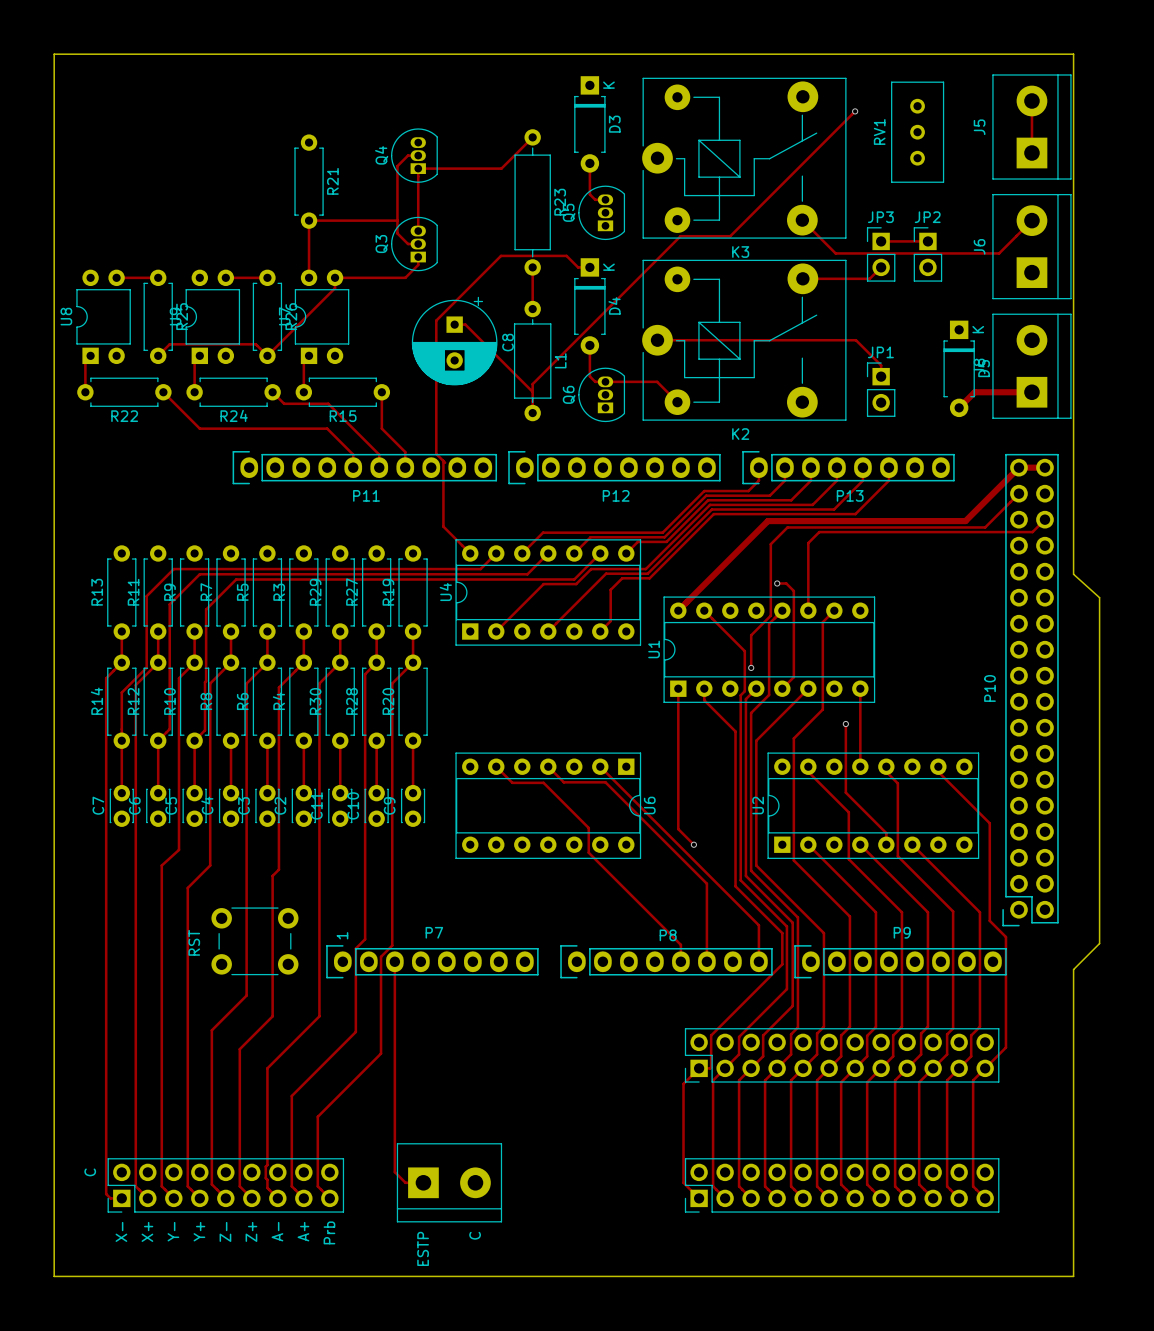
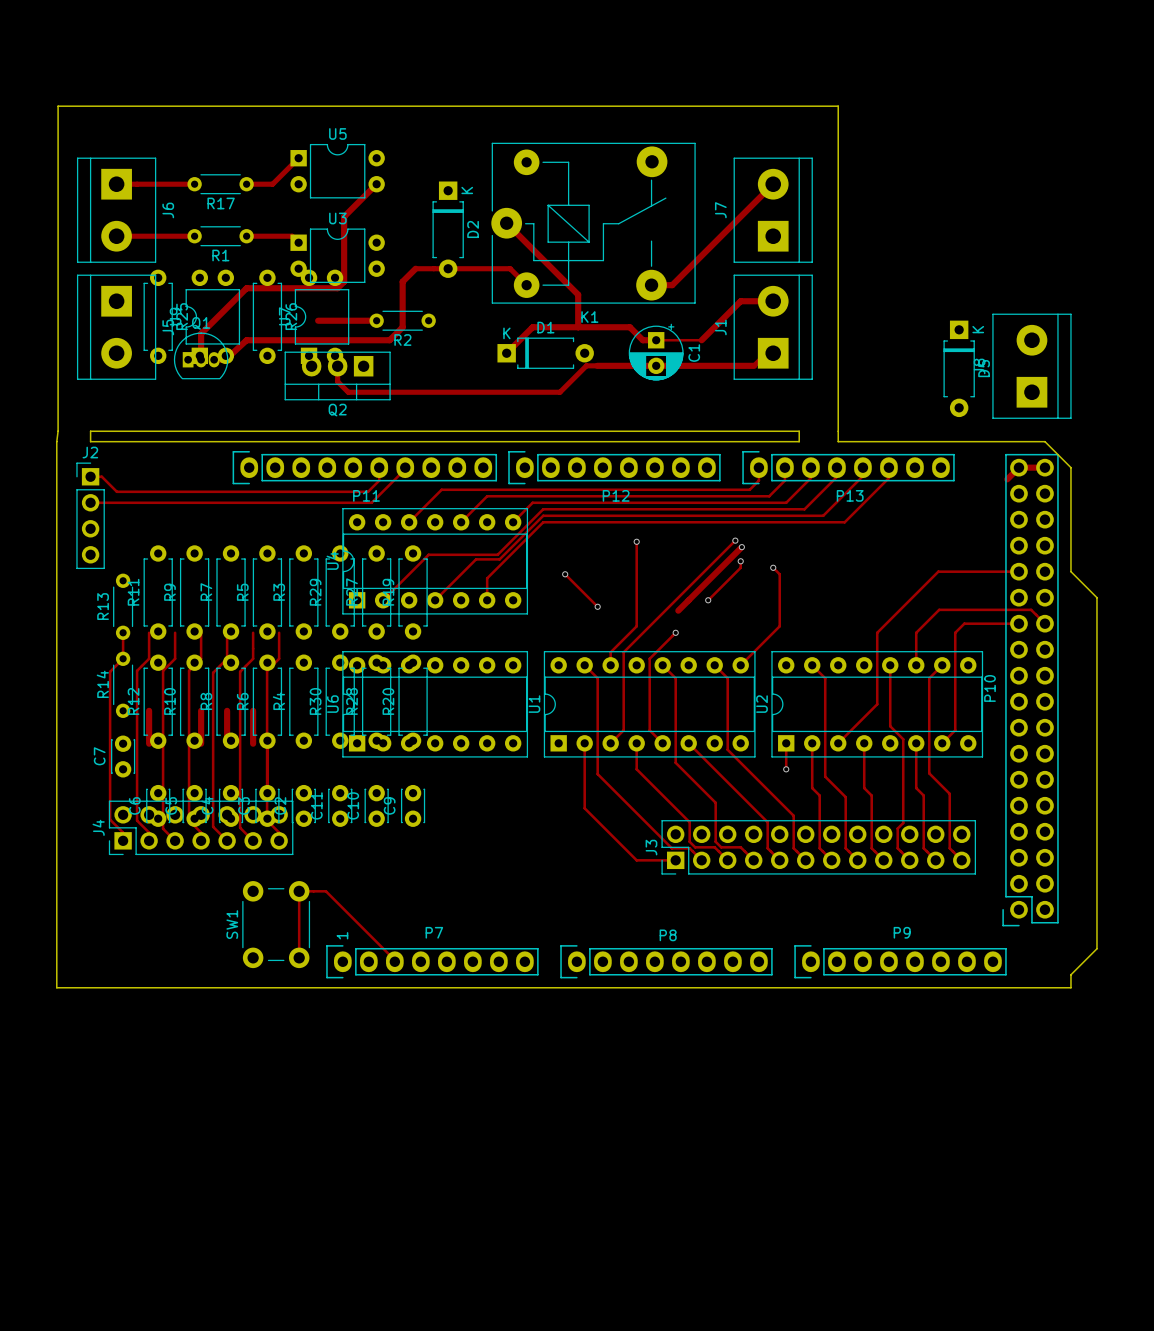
board edge: (54, 54) (54, 1276) (1073, 1276) (1073, 969) (1099, 943) (1099, 597) (1073, 574) (1073, 54) (54, 54) -> (58, 106) (56, 987) (1070, 987) (1070, 974) (1096, 948) (1096, 597) (1070, 571) (1070, 467) (1044, 441) (838, 441) (838, 106) (58, 106)
track: (1031, 101) (1031, 153) -> none
track: (855, 111) (730, 236) (680, 236) (532, 384) (532, 413) -> none
via: (855, 111) -> none
D3: (589, 124) -> none
J5 rotation: 0° (1031, 127) -> 180° (116, 327)
J5 position: (1031, 127) -> (116, 327)
RV1: (917, 132) -> none
track: (532, 137) (501, 168) (418, 168) (418, 231) -> none
Q4: (414, 155) -> none
track: (418, 155) (408, 155) (397, 166) (397, 233) (408, 244) (418, 244) -> none
track: none -> (298, 158) (272, 184) (246, 184)
K3: (744, 158) -> none
track: (589, 163) (589, 194) (595, 199) (605, 199) -> none
U5: none -> (337, 171)
R21: (309, 181) -> none
track: none -> (116, 184) (194, 184)
R17: none -> (220, 184)
track: none -> (376, 184) (344, 216) (344, 281) (337, 288) (246, 288) (201, 333) (201, 359)
track: none -> (773, 184) (672, 285) (651, 285)
R23: (532, 202) -> none
J7: none -> (773, 210)
Q5: (601, 212) -> none
track: (397, 220) (309, 220) (309, 277) -> none
track: (802, 220) (835, 253) (999, 253) (1031, 220) -> none
track: none -> (506, 223) (578, 294) (578, 327)
K1: none -> (593, 223)
D2: none -> (448, 229)
track: none -> (116, 236) (194, 236)
R1: none -> (220, 236)
track: none -> (246, 236) (292, 236) (298, 242)
track: (881, 241) (927, 241) -> none
Q3: (414, 244) -> none
J6 rotation: 0° (1031, 246) -> 180° (116, 210)
J6 position: (1031, 246) -> (116, 210)
JP3: (881, 254) -> none
JP2: (927, 254) -> none
U3: none -> (337, 255)
track: (418, 257) (418, 264) (405, 277) (335, 277) (335, 288) (267, 355) (255, 344) (169, 344) (158, 355) -> none
track: (532, 267) (532, 309) -> none
track: (589, 267) (578, 267) (566, 255) (501, 255) (436, 320) (436, 453) (445, 462) -> none
track: (881, 267) (869, 278) (802, 278) -> none
track: (116, 277) (158, 277) -> none
track: (225, 277) (267, 277) -> none
track: none -> (526, 285) (510, 268) (415, 268) (402, 281) (402, 327) (389, 340) (246, 340) (225, 359) (214, 359)
D4: (589, 306) -> none
U8: (103, 316) -> none
track: none -> (318, 320) (376, 320)
R2: none -> (402, 320)
track: (454, 324) (465, 324) (532, 391) -> none
J1: none -> (773, 327)
track: none -> (657, 340) (642, 340) (629, 327) (532, 327) (506, 353)
track: (701, 340) (856, 340) (881, 365) (881, 376) -> (701, 340) (740, 301) (773, 301)
K2: (744, 340) -> none
C8: (454, 341) -> none
track: (589, 345) (589, 376) (595, 381) (657, 381) (677, 402) -> none
C1: none -> (656, 352)
D1: none -> (545, 353)
track: none -> (773, 353) (766, 353) (754, 365) (586, 365) (560, 392) (348, 392) (337, 381) (337, 366)
track: (90, 355) (85, 361) (85, 392) -> none
track: (199, 355) (194, 361) (194, 392) -> none
Q1: none -> (201, 355)
track: (309, 355) (303, 361) (303, 392) -> none
L1: (532, 361) -> none
Q2: none -> (337, 375)
JP1: (881, 389) -> none
R22: (124, 392) -> none
track: (163, 392) (199, 428) (327, 428) (353, 454) (353, 467) -> none
R24: (233, 392) -> none
track: (272, 392) (284, 403) (328, 403) (379, 454) (379, 467) -> (90, 476) (101, 476) (116, 491) (368, 491) (379, 480) (379, 467)
R15: (342, 392) -> none
track: (381, 392) (381, 428) (405, 452) (405, 467) -> (90, 502) (371, 502) (405, 467)
track: (1031, 392) (974, 392) (959, 407) -> none
Q6: (601, 394) -> none
board edge: none -> (90, 431) (90, 441) (799, 441) (799, 431) (90, 431)
track: (443, 461) (443, 526) (470, 553) -> none
track: (836, 476) (836, 480) (812, 504) (710, 504) (645, 569) (591, 569) (576, 584) (543, 584) (496, 631) -> (836, 476) (804, 509) (543, 509) (497, 554) (428, 554) (383, 600)
track: (862, 476) (862, 480) (834, 509) (711, 509) (647, 573) (606, 573) (548, 631) -> (862, 476) (823, 515) (543, 515) (499, 559) (476, 559) (435, 600)
track: (810, 478) (810, 480) (791, 500) (708, 500) (666, 541) (637, 541) (626, 553) -> (810, 478) (786, 502) (532, 502) (513, 522)
track: (888, 478) (888, 480) (855, 514) (713, 514) (649, 578) (622, 578) (610, 589) (610, 621) (600, 631) -> (888, 478) (844, 522) (543, 522) (487, 578) (487, 600)
track: (1007, 479) (965, 521) (767, 521) (740, 548) -> none
track: (749, 489) (704, 491) (662, 532) (543, 532) (522, 553) -> (749, 489) (441, 489) (409, 522)
track: (1018, 493) (985, 527) (787, 527) (770, 544) (770, 615) (751, 635) (751, 667) -> none
track: (769, 495) (706, 495) (664, 537) (590, 537) (574, 553) -> (769, 495) (487, 496) (461, 522)
J2: none -> (90, 515)
track: (1044, 519) (1032, 532) (819, 532) (808, 543) (808, 610) -> none
track: none -> (735, 540) (623, 652) (623, 730) (610, 743)
via: none -> (735, 540)
track: none -> (636, 541) (636, 626) (610, 652) (610, 665)
via: none -> (636, 541)
R13 footprint: [107, 545, 137, 640] -> [113, 573, 134, 640]
via: none -> (741, 547)
track: (496, 553) (480, 569) (173, 569) (146, 596) (146, 667) (121, 692) (121, 793) -> none
track: (548, 553) (527, 574) (199, 574) (169, 604) (169, 729) (158, 740) (158, 793) -> none
track: (600, 553) (574, 579) (236, 579) (206, 609) (205, 730) (194, 740) (194, 793) -> none
track: none -> (740, 561) (740, 567) (708, 600)
via: none -> (740, 561)
track: none -> (773, 567) (779, 574) (779, 626) (740, 665)
track: none -> (1018, 571) (938, 571) (877, 632) (877, 704) (838, 743)
track: none -> (565, 574) (597, 606)
via: none -> (565, 574)
track: (777, 583) (786, 583) (793, 591) (793, 677) (782, 688) -> none
via position: (777, 583) -> (773, 567)
U4 position: (548, 592) -> (435, 561)
via: none -> (708, 600)
via: none -> (597, 606)
track: (704, 610) (744, 651) (744, 691) (740, 695) (740, 880) (786, 926) (786, 989) (739, 1036) (739, 1054) (713, 1080) (713, 1186) (725, 1198) -> none
track: (782, 610) (769, 623) (769, 694) (751, 712) (751, 870) (797, 917) (797, 1027) (791, 1034) (791, 1054) (765, 1080) (765, 1186) (777, 1198) -> none
track: (834, 610) (822, 622) (822, 709) (793, 738) (793, 860) (849, 916) (849, 1026) (841, 1035) (841, 1056) (817, 1080) (817, 1186) (829, 1198) -> none
track: none -> (1018, 623) (964, 623) (955, 632) (955, 730) (942, 743)
track: none -> (1044, 623) (1031, 609) (939, 609) (916, 632) (916, 665)
track: (121, 631) (121, 662) (106, 678) (106, 1194) (110, 1198) (121, 1198) -> none
track: (158, 631) (158, 662) (135, 685) (135, 1186) (147, 1198) -> none
track: (194, 631) (194, 662) (179, 678) (179, 849) (161, 865) (161, 1186) (173, 1198) -> none
track: (231, 631) (231, 662) (210, 683) (210, 865) (187, 887) (187, 1186) (199, 1198) -> none
track: (267, 631) (267, 662) (246, 683) (246, 995) (211, 1030) (211, 1184) (225, 1198) -> none
track: (303, 631) (303, 662) (278, 687) (278, 869) (272, 875) (272, 1016) (239, 1049) (239, 1186) (251, 1198) -> none
track: (340, 631) (340, 662) (319, 683) (319, 1016) (267, 1068) (265, 1178) (267, 1188) (277, 1198) -> none
track: (376, 631) (376, 662) (365, 674) (365, 939) (355, 948) (355, 1031) (291, 1096) (291, 1186) (303, 1198) -> none
track: (413, 631) (413, 662) (392, 683) (392, 945) (381, 956) (381, 1053) (317, 1116) (317, 1186) (329, 1198) -> none
track: none -> (123, 632) (123, 658) (110, 671) (110, 819) (123, 832) (123, 840)
track: none -> (149, 632) (149, 658) (137, 670) (137, 820) (149, 832) (149, 840)
track: none -> (175, 632) (175, 658) (163, 670) (163, 828) (175, 840)
track: none -> (201, 632) (201, 658) (189, 670) (189, 820) (201, 832) (201, 840)
track: none -> (227, 632) (227, 658) (213, 672) (213, 826) (227, 840)
track: none -> (253, 632) (253, 658) (240, 671) (240, 827) (253, 840)
track: none -> (279, 632) (279, 658) (267, 670) (267, 820) (279, 832) (279, 840)
track: none -> (675, 632) (649, 658) (649, 730) (662, 743)
via: none -> (675, 632)
U1 position: (769, 649) -> (649, 704)
R14 footprint: [107, 654, 137, 749] -> [113, 651, 134, 718]
track: none -> (584, 665) (597, 678) (597, 774) (671, 848) (689, 848) (701, 860)
track: none -> (662, 665) (675, 678) (675, 762) (715, 802) (715, 841) (721, 847) (740, 847) (753, 860)
track: none -> (714, 665) (727, 678) (727, 749) (793, 815) (793, 848) (805, 860)
track: none -> (812, 665) (825, 678) (825, 776) (845, 797) (845, 848) (857, 860)
track: none -> (890, 665) (890, 726) (903, 739) (903, 823) (897, 828) (897, 848) (909, 860)
track: none -> (942, 665) (929, 678) (929, 773) (949, 793) (949, 848) (961, 860)
via: (751, 667) -> none
track: (678, 688) (678, 829) (693, 844) -> none
track: (704, 688) (704, 700) (735, 731) (735, 886) (782, 933) (782, 964) (711, 1035) (711, 1067) (699, 1068) (683, 1083) (683, 1182) (699, 1198) -> none
track: (756, 688) (745, 699) (745, 875) (792, 922) (792, 1005) (763, 1035) (763, 1056) (739, 1080) (739, 1186) (751, 1198) -> none
track: (808, 688) (756, 740) (756, 865) (823, 933) (823, 1026) (817, 1033) (817, 1054) (791, 1080) (791, 1186) (803, 1198) -> none
track: (860, 688) (860, 766) -> none
track: none -> (149, 710) (149, 743)
track: none -> (201, 710) (201, 743)
track: none -> (227, 710) (227, 743)
track: none -> (253, 710) (253, 743)
track: (845, 724) (845, 792) (886, 833) (886, 844) -> none
via: (845, 724) -> none
track: (231, 740) (231, 793) -> none
track: (303, 740) (303, 793) -> none
track: (340, 740) (340, 793) -> none
track: (376, 740) (376, 793) -> none
track: (413, 740) (413, 793) -> none
track: none -> (584, 743) (584, 808) (636, 860) (675, 860)
track: none -> (636, 743) (636, 769) (689, 822) (689, 841) (695, 847) (714, 847) (727, 860)
track: none -> (688, 743) (767, 822) (767, 848) (779, 860)
track: none -> (786, 743) (786, 769)
track: none -> (812, 743) (812, 788) (819, 795) (819, 848) (831, 860)
track: none -> (864, 743) (864, 788) (871, 795) (871, 848) (883, 860)
track: none -> (916, 743) (916, 788) (923, 795) (923, 848) (935, 860)
track: (496, 766) (512, 782) (543, 782) (588, 828) (588, 852) (680, 944) (680, 961) -> none
track: (548, 766) (563, 782) (605, 782) (706, 883) (706, 961) -> none
track: (600, 766) (758, 925) (758, 961) -> none
track: (808, 766) (808, 771) (848, 812) (848, 859) (901, 912) (901, 1026) (893, 1035) (893, 1056) (867, 1082) (867, 1184) (881, 1198) -> none
track: (886, 766) (886, 771) (897, 783) (897, 856) (953, 911) (953, 1028) (947, 1034) (947, 1054) (919, 1082) (919, 1184) (933, 1198) -> none
track: (938, 766) (938, 771) (989, 823) (989, 920) (1005, 937) (1005, 1047) (973, 1080) (973, 1186) (985, 1198) -> none
via: none -> (786, 769)
C7 position: (121, 805) -> (123, 756)
U6 rotation: 0° (548, 805) -> 180° (435, 704)
U6 position: (548, 805) -> (435, 704)
U2 position: (873, 805) -> (877, 704)
J4: none -> (201, 827)
via: (693, 844) -> none
track: (808, 844) (875, 912) (875, 1027) (867, 1035) (867, 1056) (841, 1082) (841, 1184) (855, 1198) -> none
track: (860, 844) (927, 912) (927, 1026) (921, 1033) (921, 1054) (895, 1080) (895, 1186) (907, 1198) -> none
track: (912, 844) (979, 912) (979, 1026) (971, 1035) (971, 1056) (947, 1080) (947, 1186) (959, 1198) -> none
J3: none -> (818, 847)
SW1: none -> (276, 924)
part: (254, 941) -> none
text: RST (194, 942) -> none
track: (394, 961) (394, 1172) (405, 1182) (423, 1182) -> (394, 961) (325, 891) (299, 891) (299, 957)
part: (842, 1055) -> none
text: C (90, 1172) -> none
part: (449, 1182) -> none
part: (225, 1185) -> none
part: (842, 1185) -> none
text: X- (121, 1231) -> none
text: X+ (147, 1231) -> none
text: Y- (173, 1231) -> none
text: Y+ (199, 1231) -> none
text: Z- (225, 1231) -> none
text: Z+ (251, 1231) -> none
text: A- (277, 1231) -> none
text: A+ (303, 1231) -> none
text: Prb (329, 1232) -> none
text: C (475, 1235) -> none
text: ESTP (423, 1248) -> none

